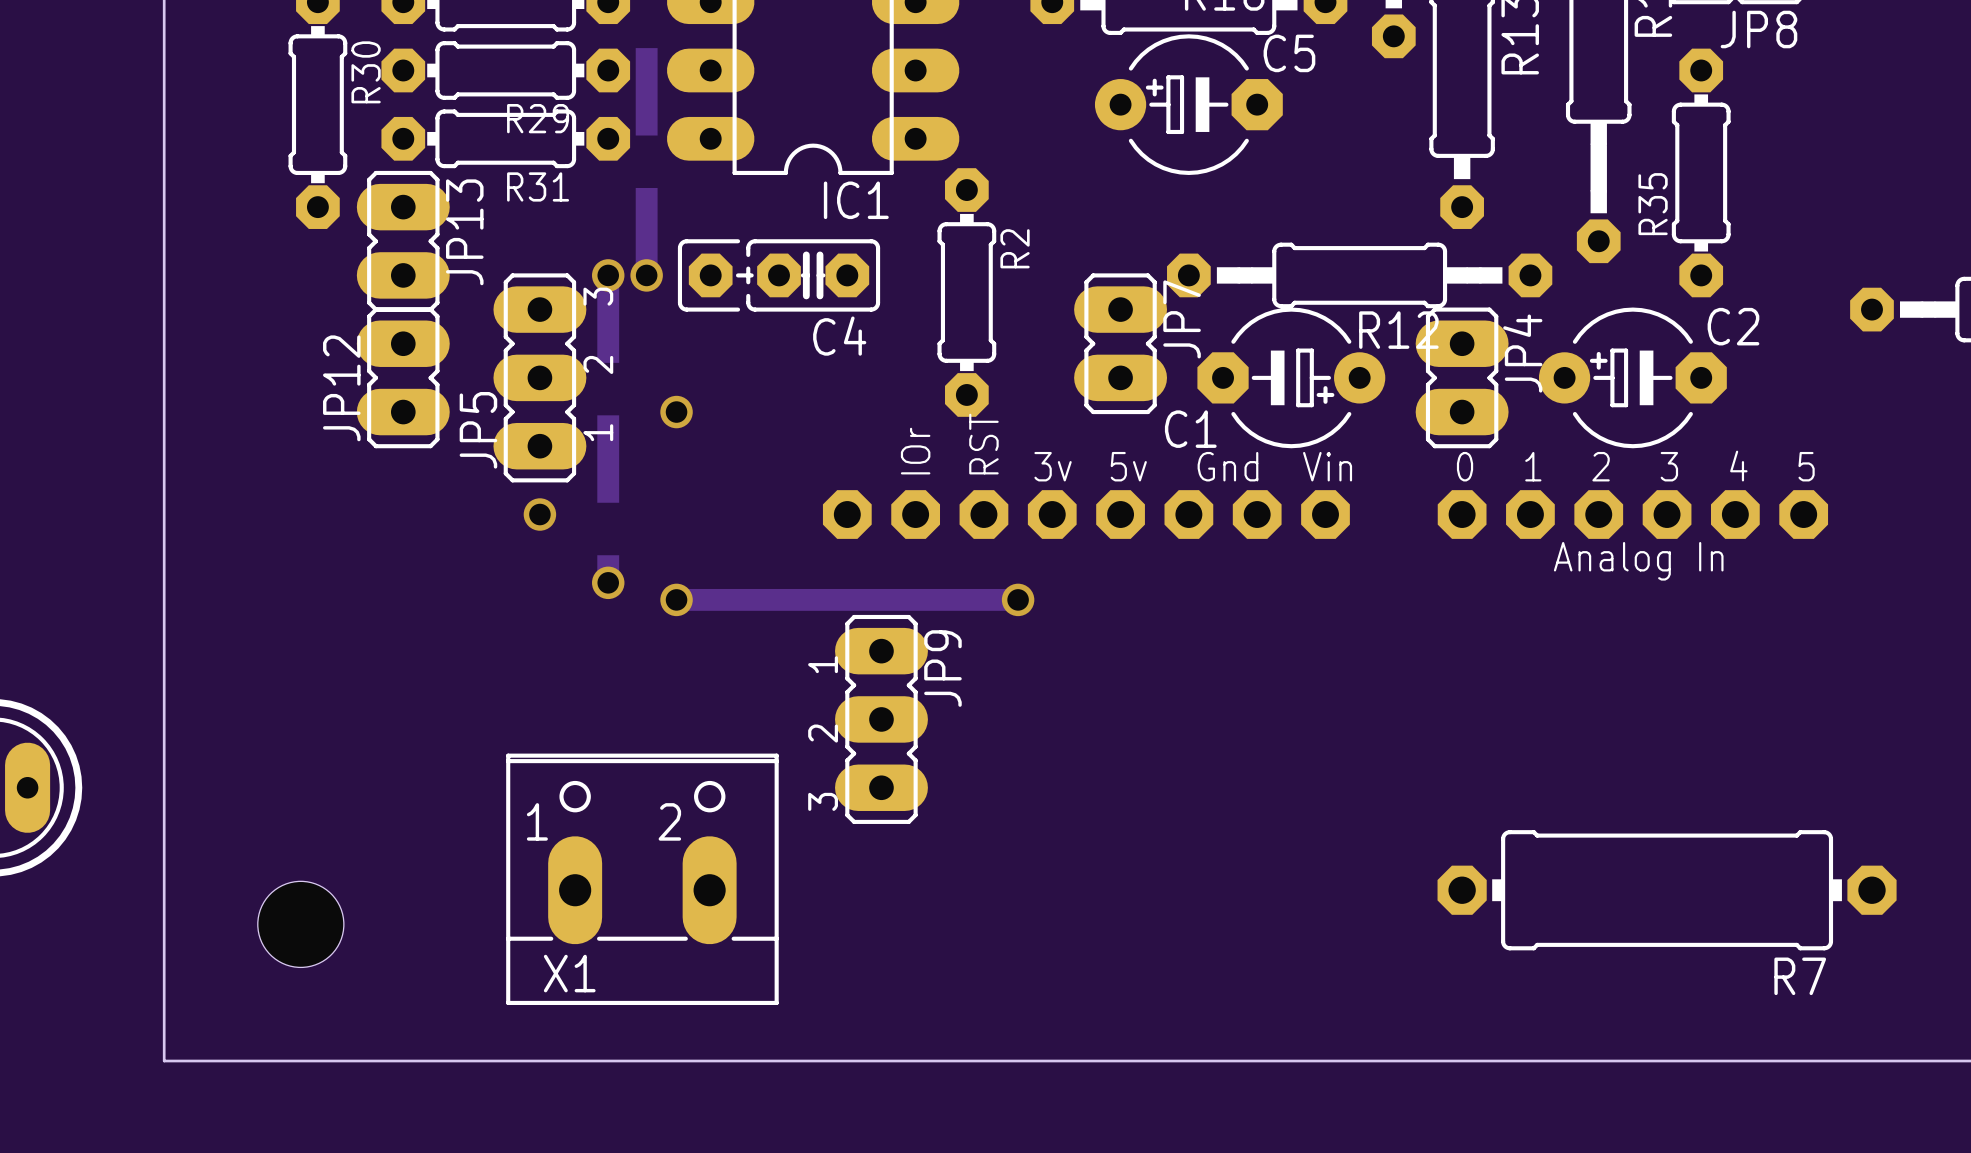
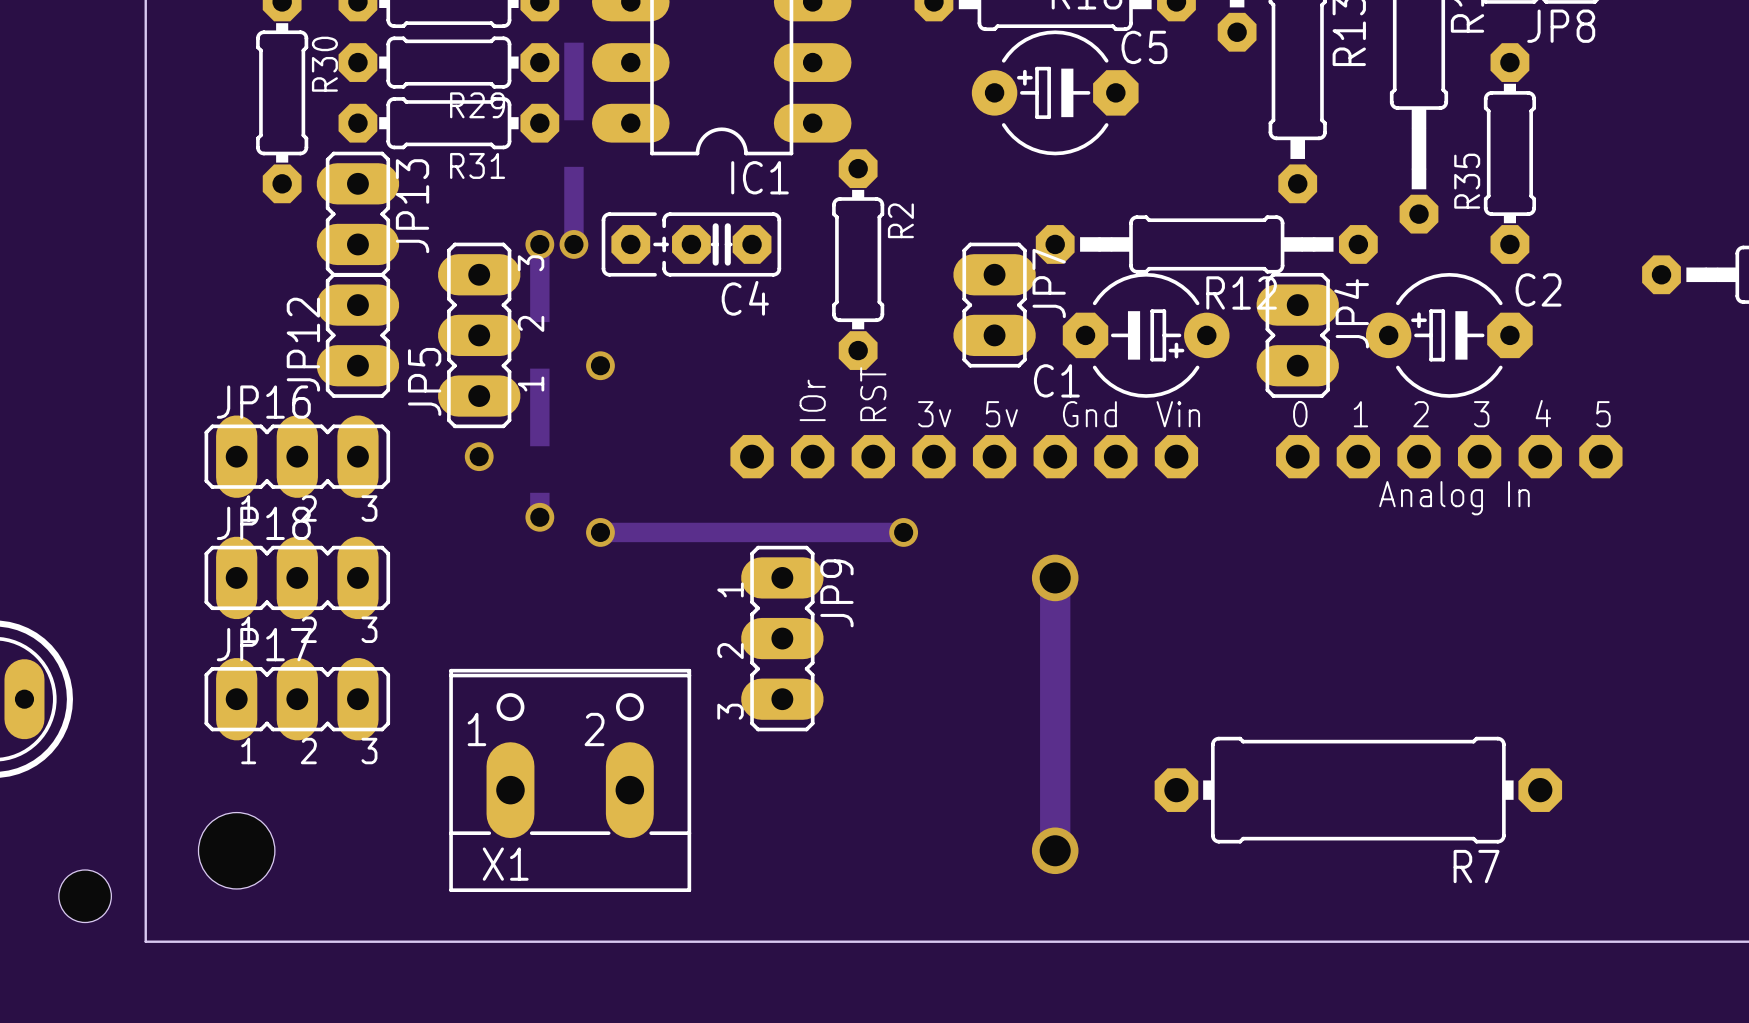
JP16: none -> (297, 456)
JP18: none -> (297, 577)
track: none -> (1055, 577) (1055, 850)
via: none -> (1055, 577)
JP17: none -> (297, 699)
R7 position: (1667, 890) -> (1358, 790)
hole position: (300, 924) -> (236, 850)
via: none -> (1055, 850)
hole: none -> (85, 896)

